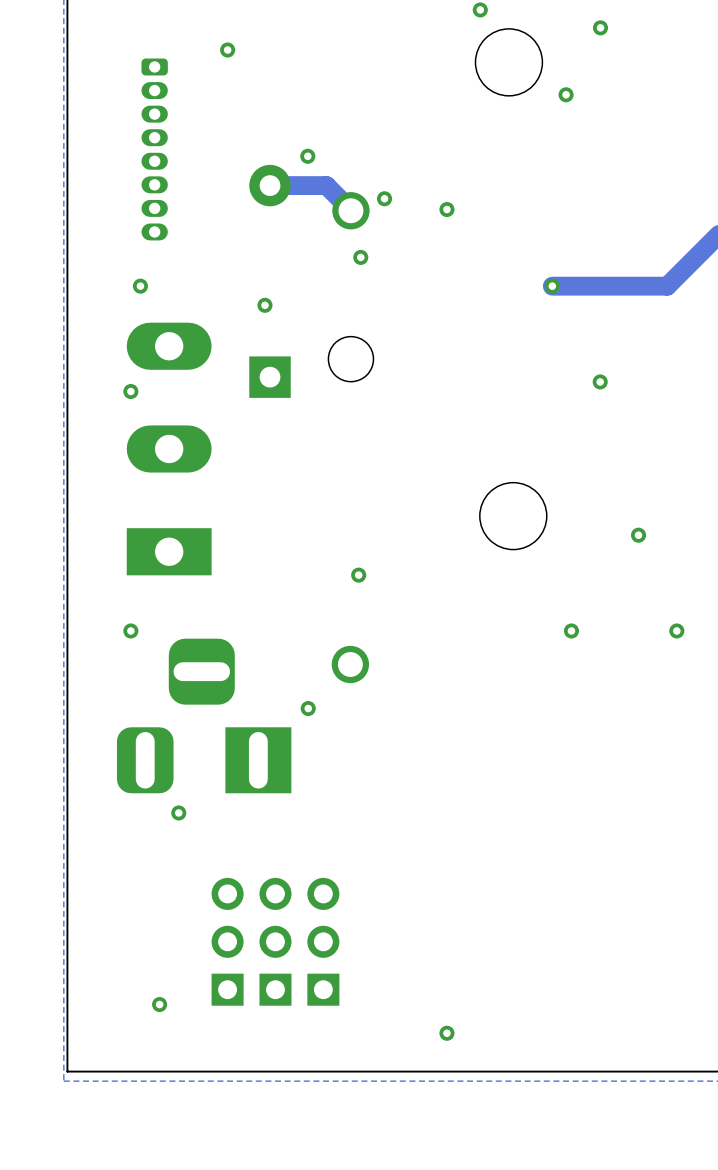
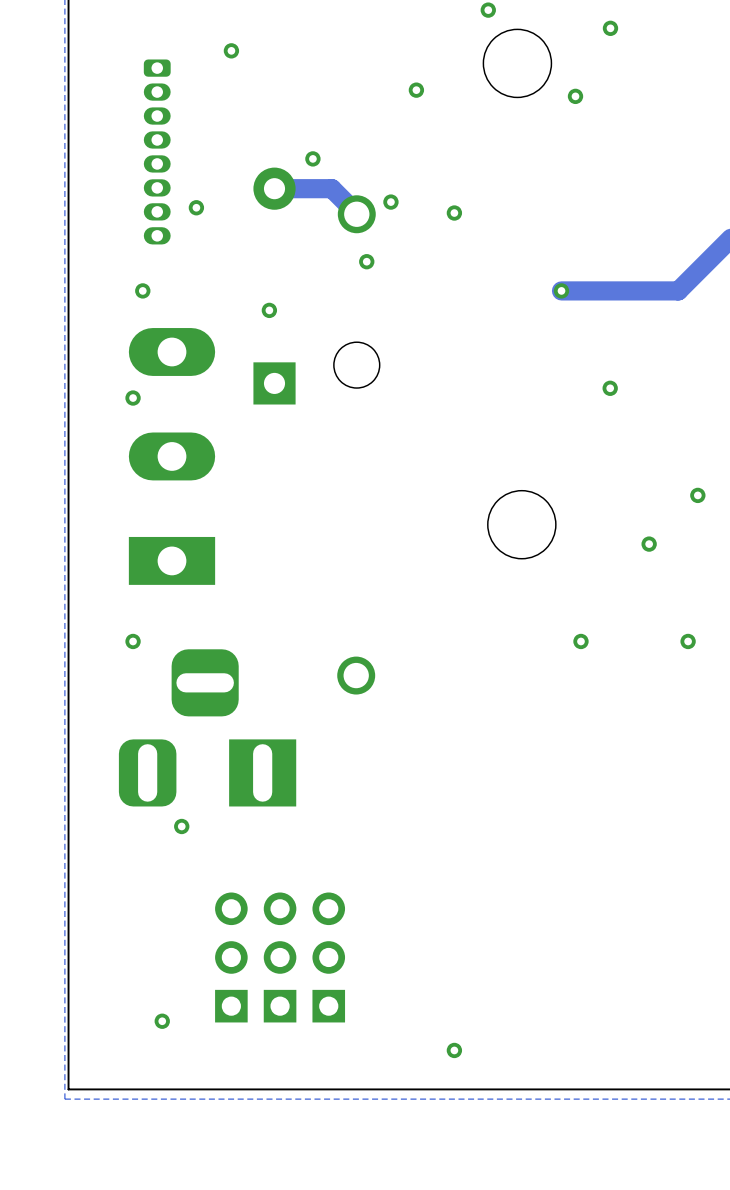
via: none -> (416, 90)
via: none -> (196, 207)
via: none -> (697, 495)
via: (358, 575) -> none
via: (308, 708) -> none

